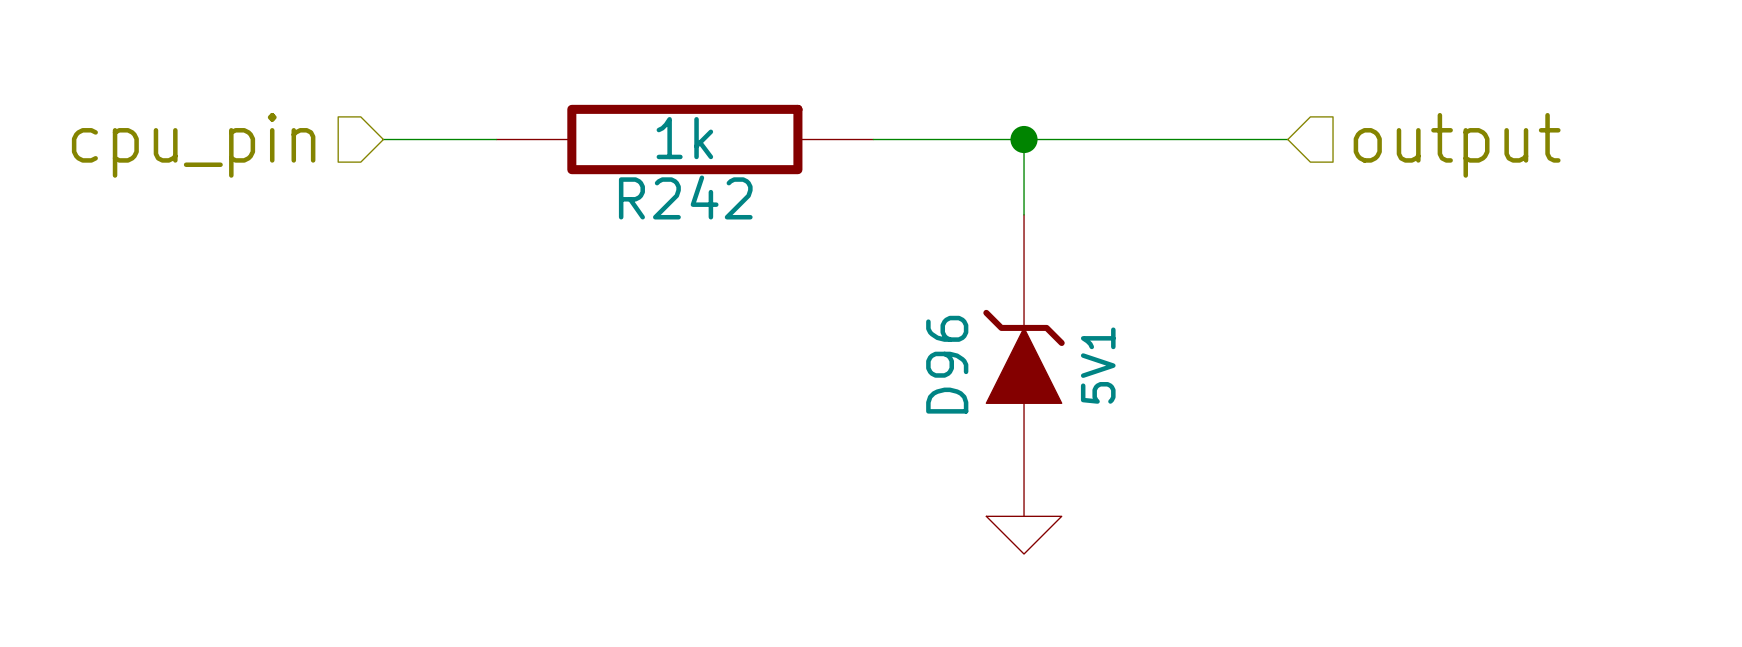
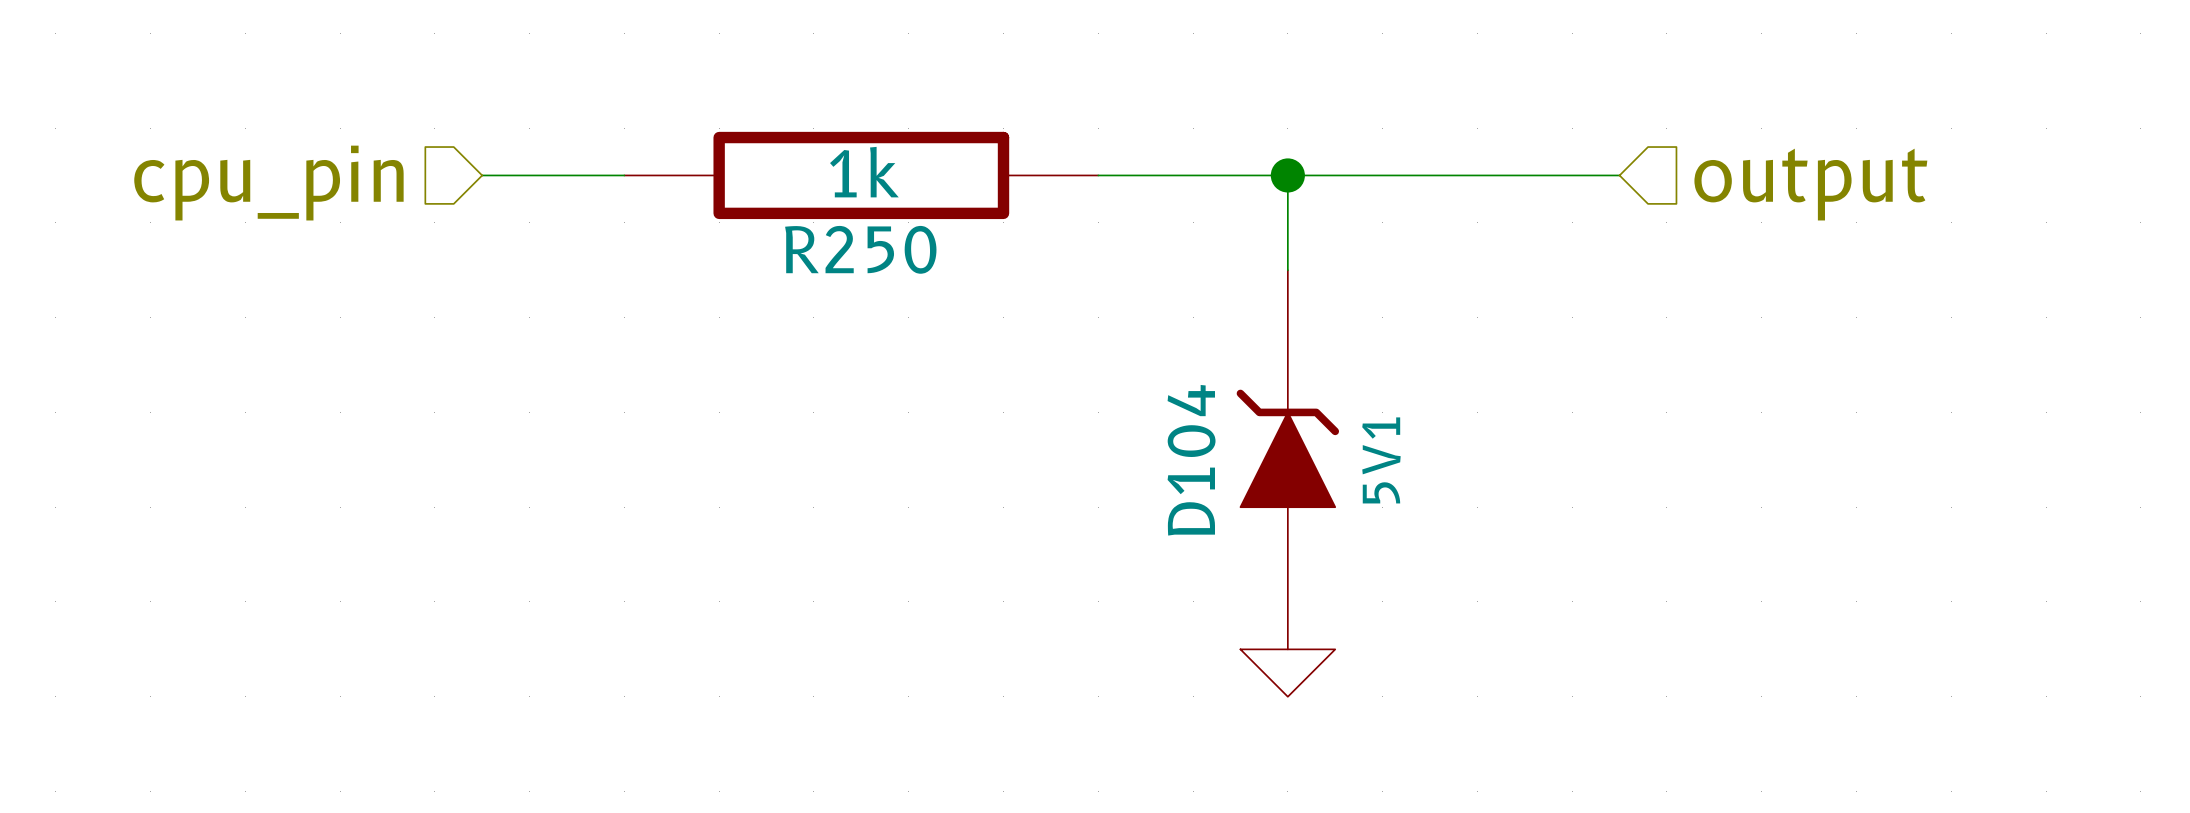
R242 name: R242 (685, 197) -> R250 (860, 249)
D96 name: D96 (947, 364) -> D104 (1191, 460)

